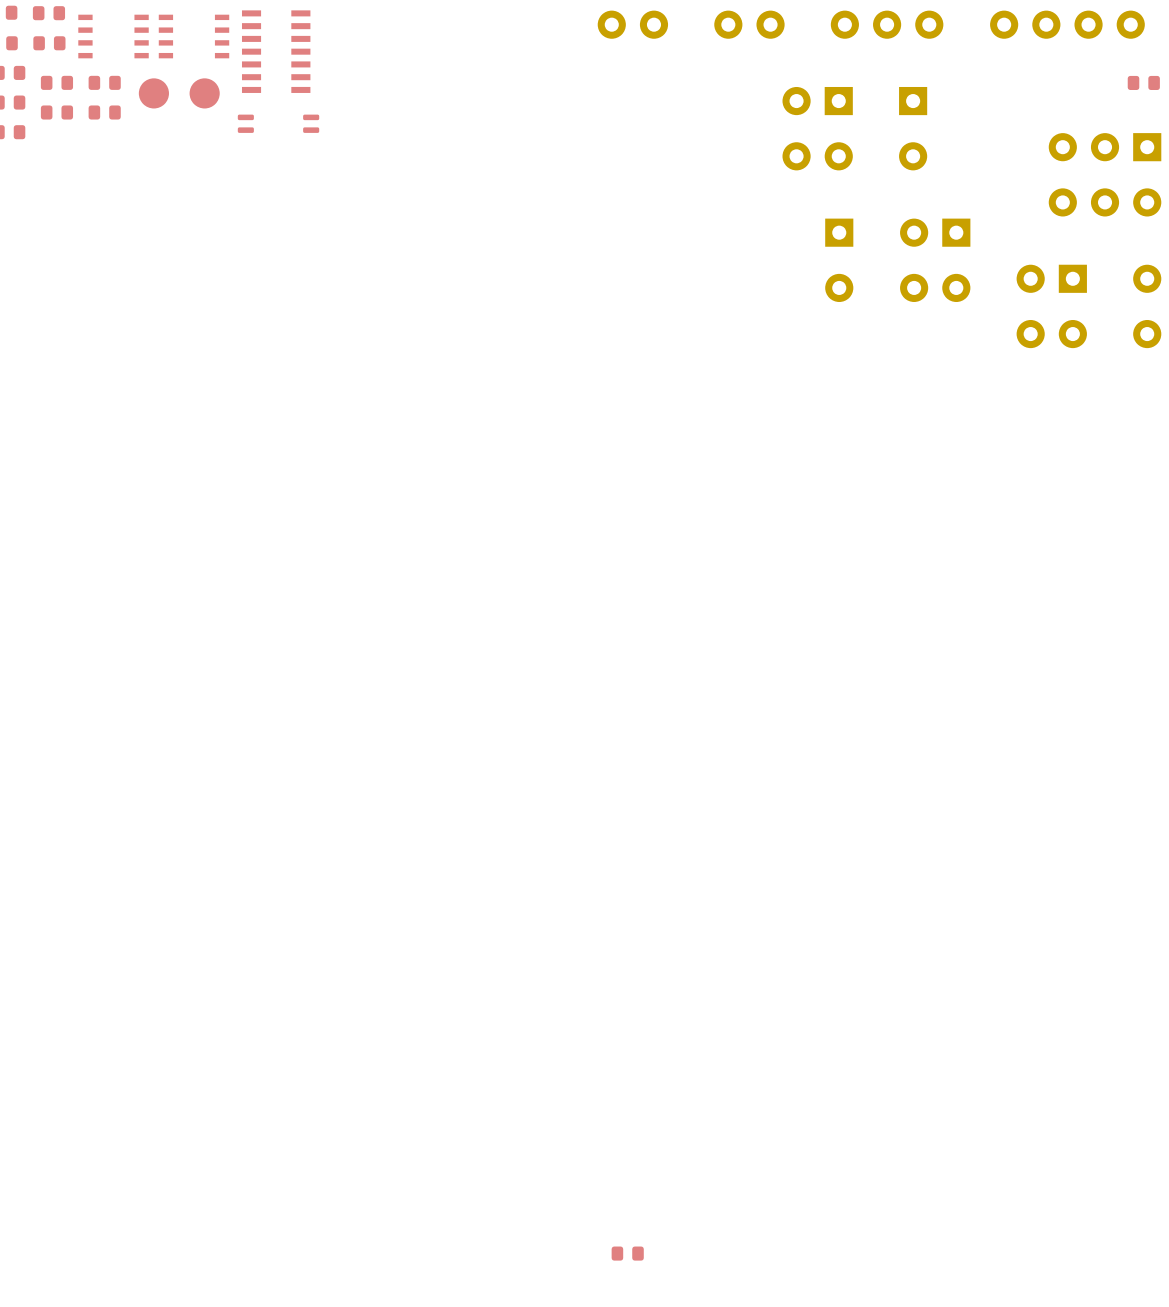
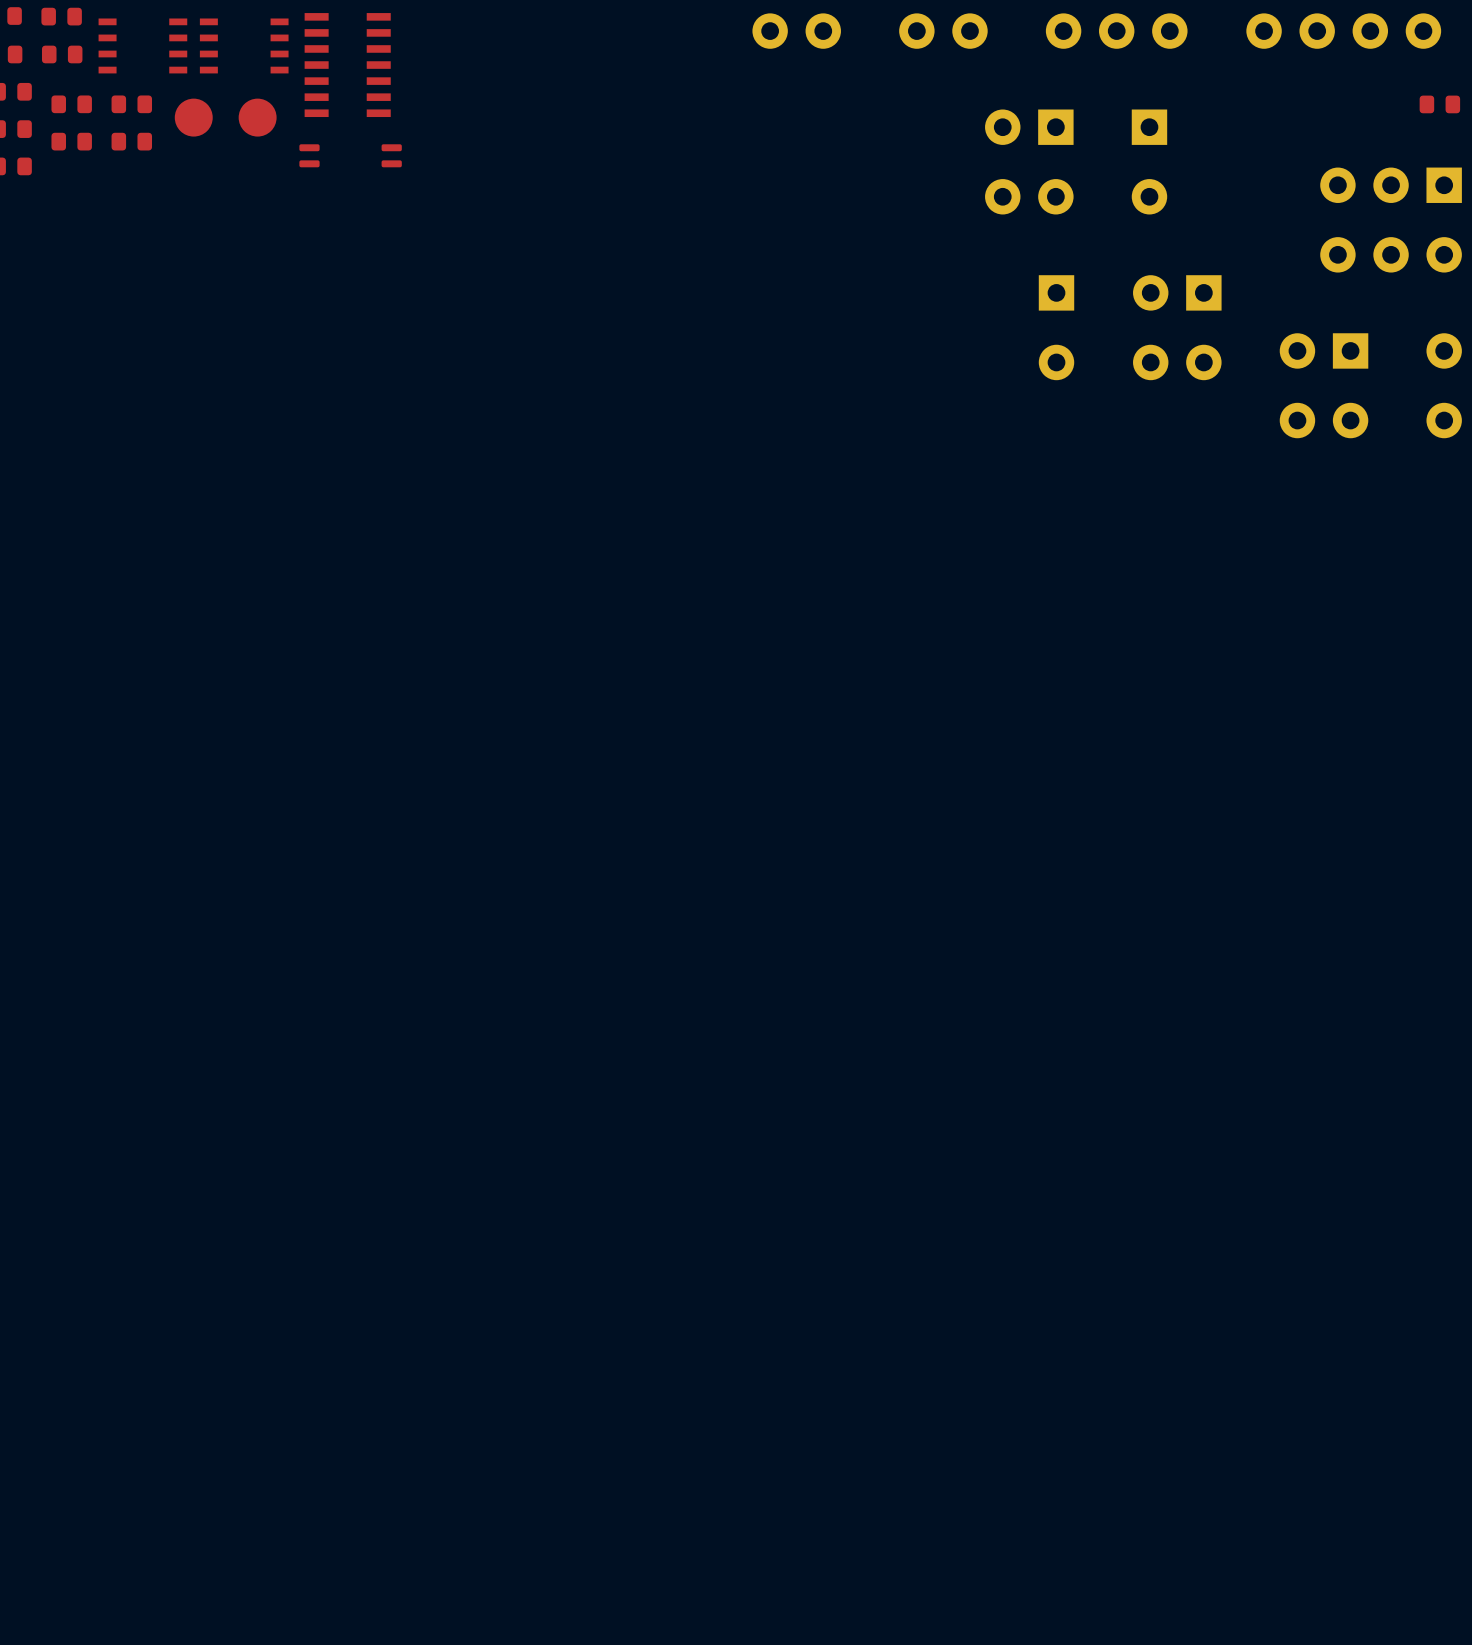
part: (627, 1253) -> none

